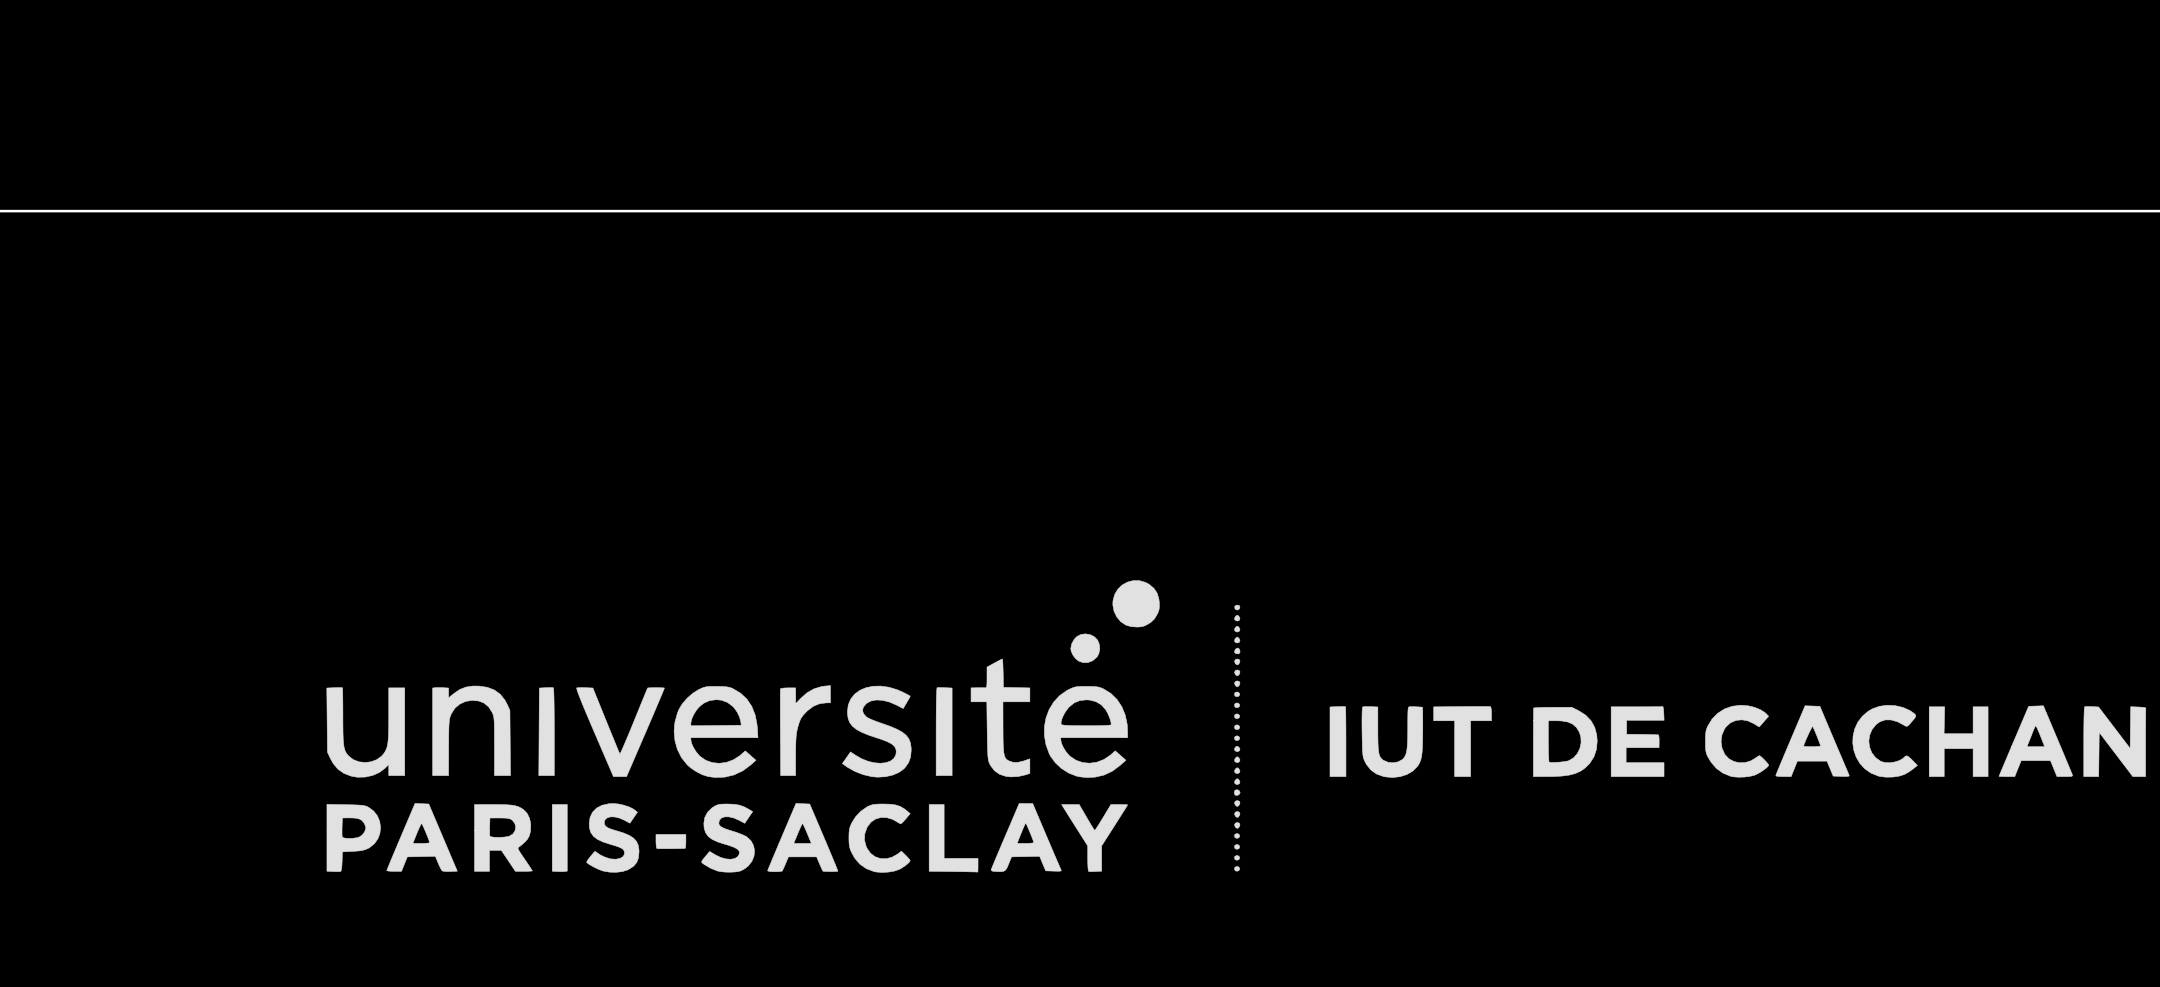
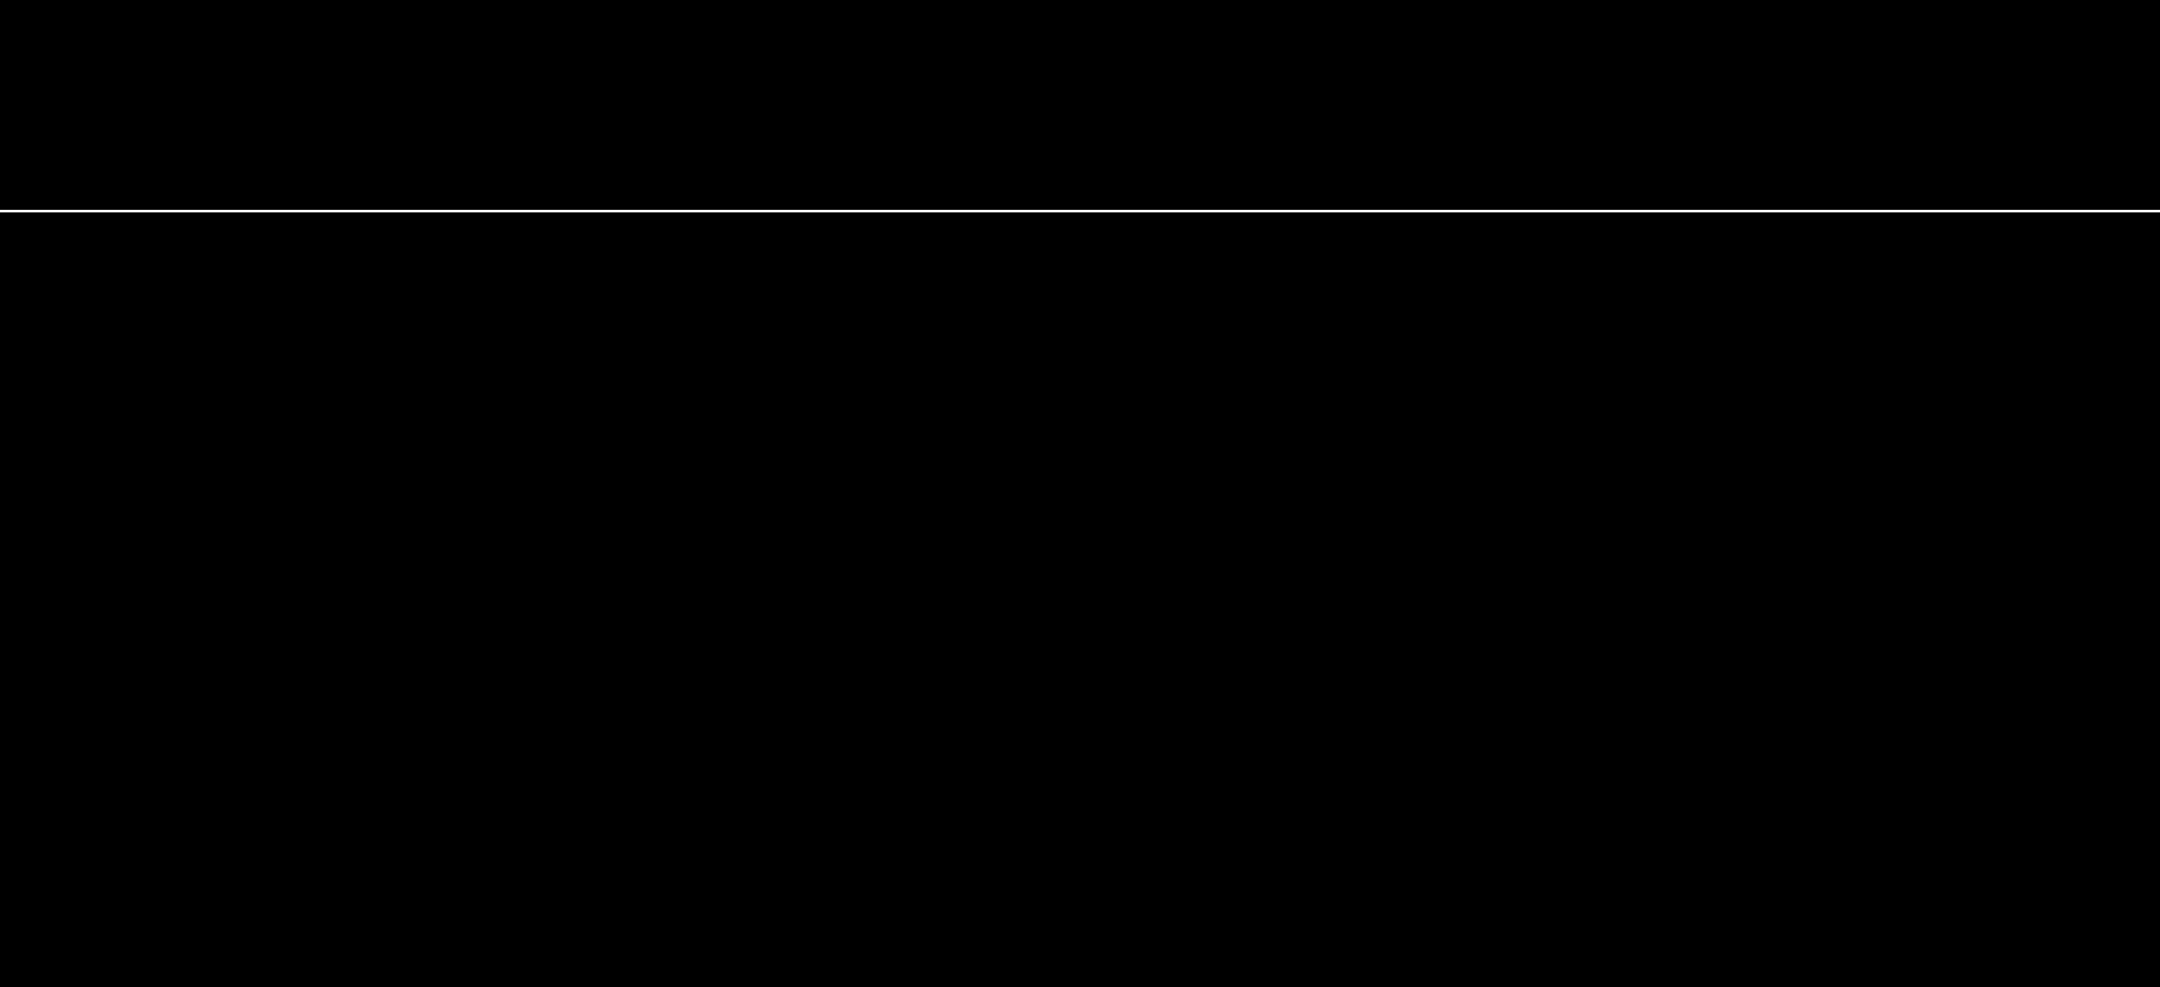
drawing: [326, 580, 2147, 873] -> none

